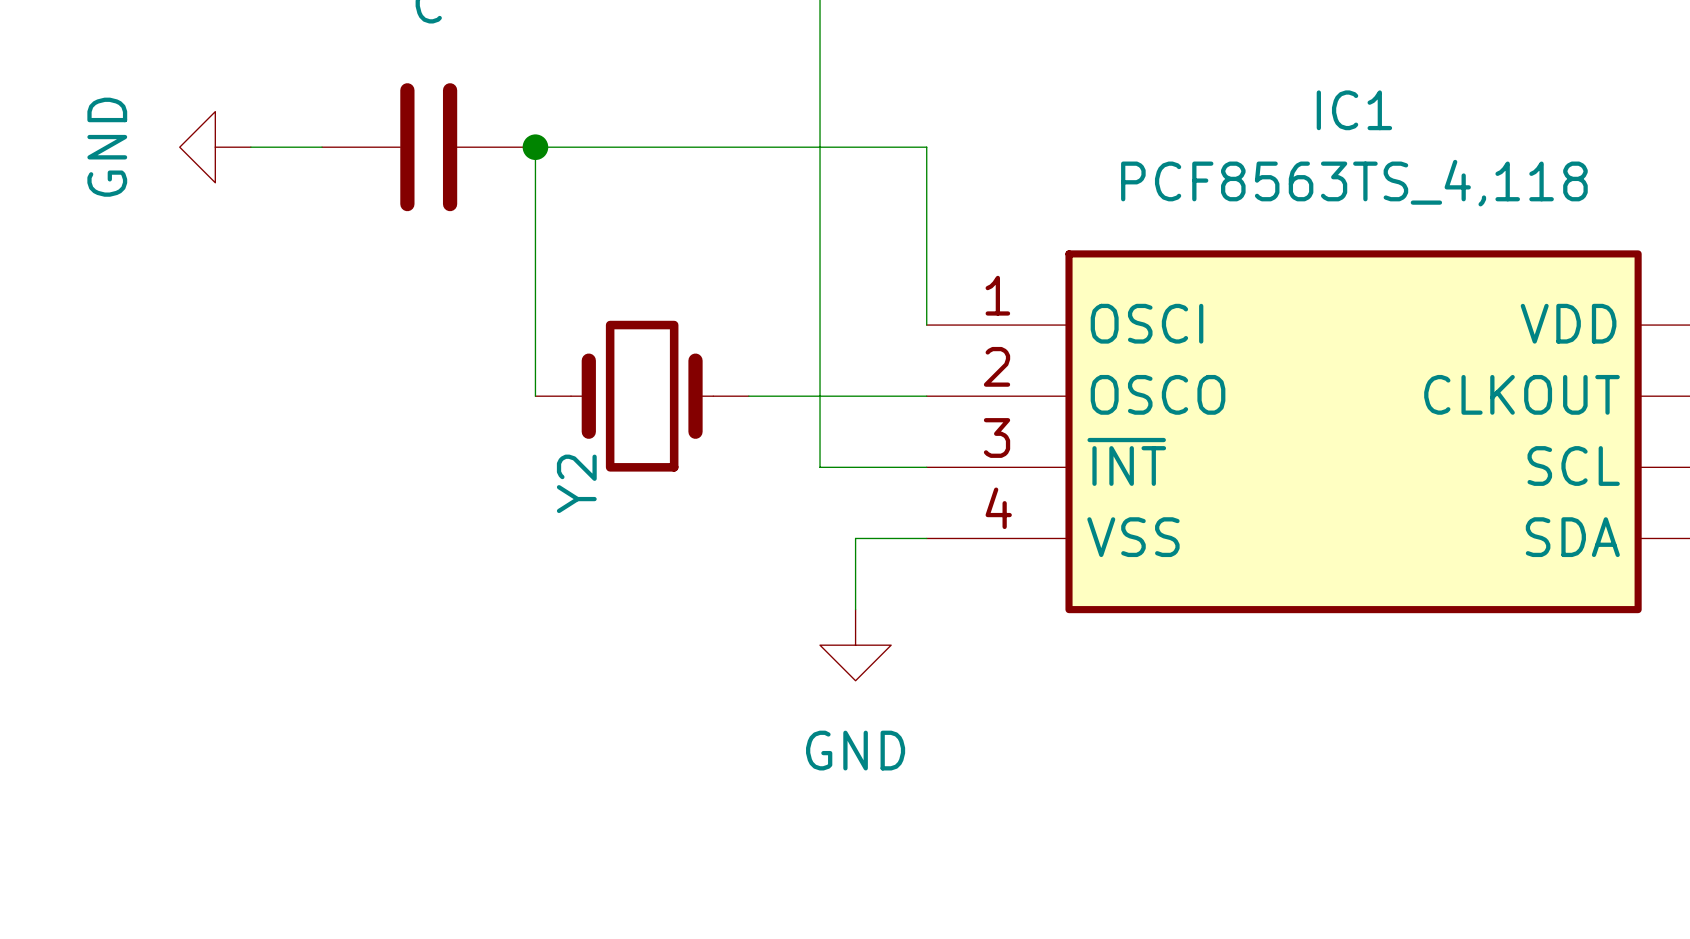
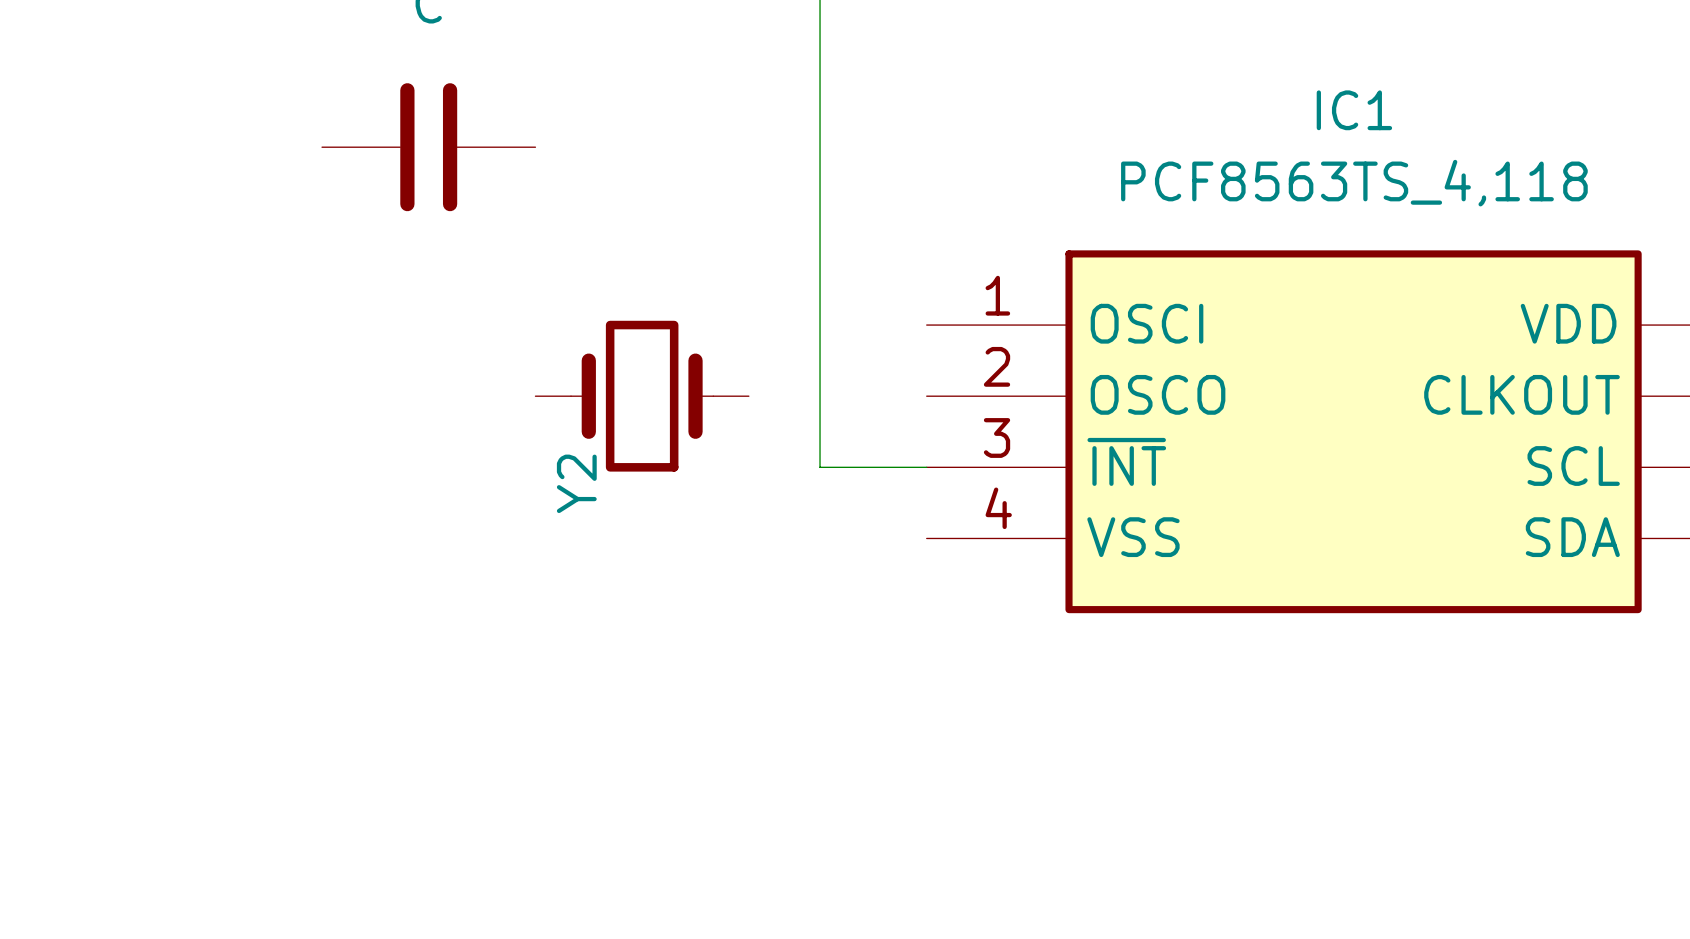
power symbol: GND (215, 147) -> none
wire: (250, 147) (322, 147) -> none
junction: (535, 147) -> none
wire: (926, 325) (926, 147) (535, 147) (535, 396) -> none
wire: (748, 396) (926, 396) -> none
wire: (926, 538) (855, 538) (855, 609) -> none
power symbol: GND (855, 645) -> none

